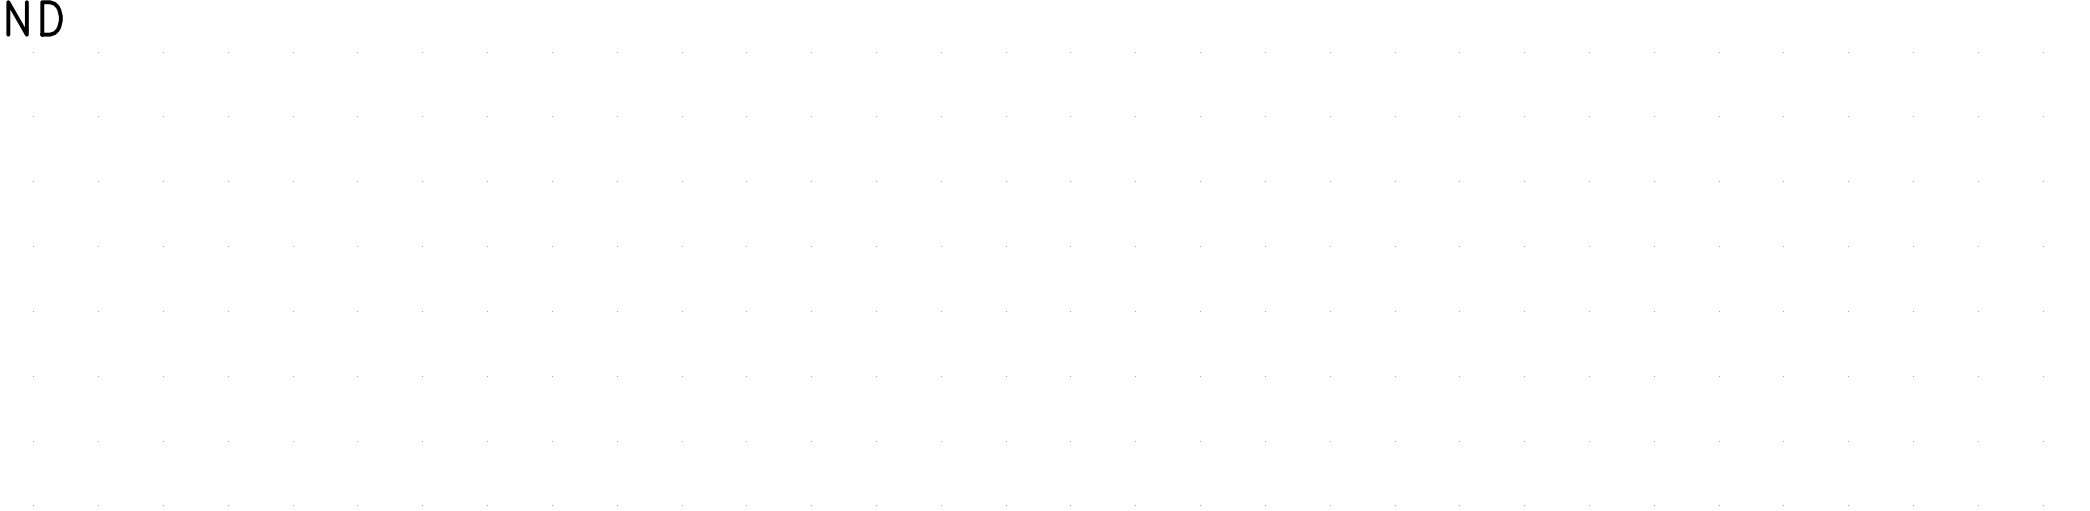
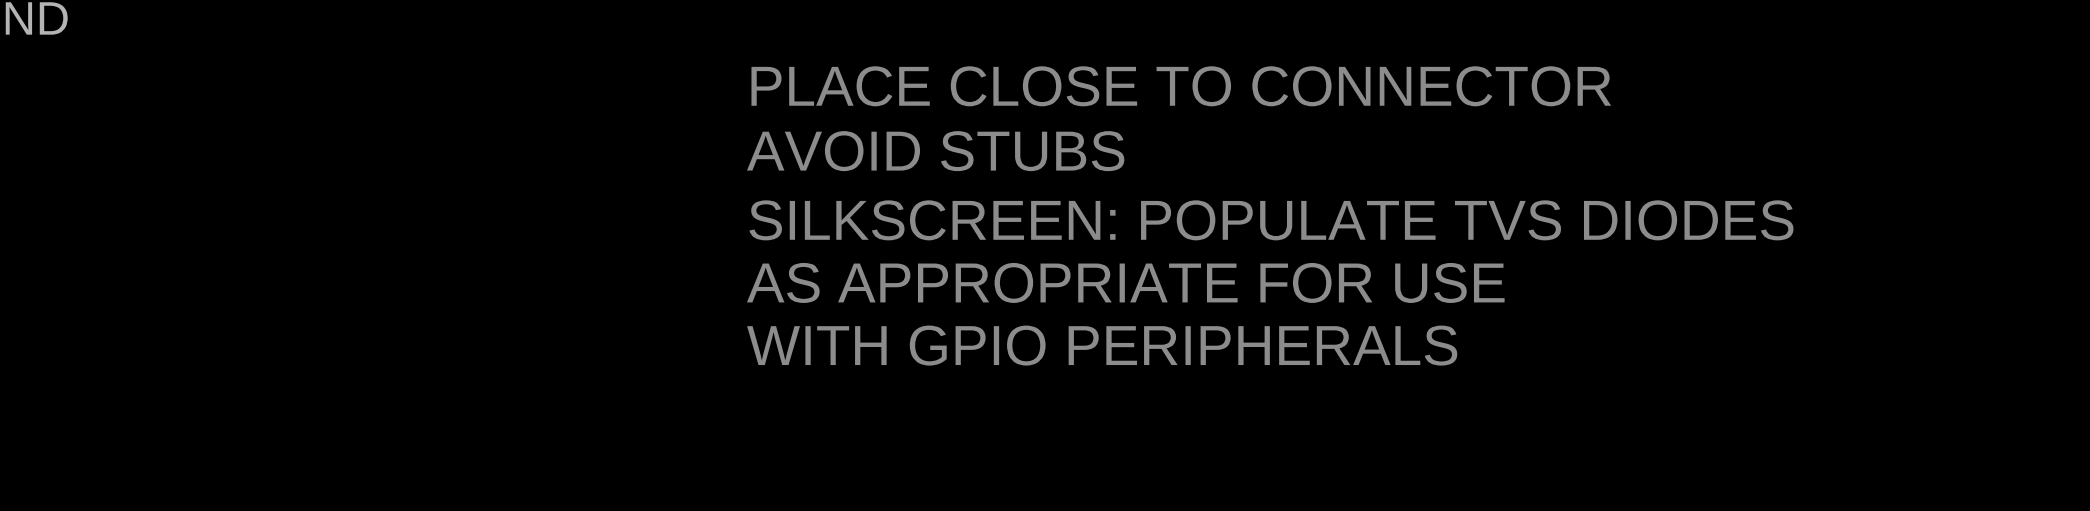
text: none -> PLACE CLOSE TO CONNECTOR (1181, 86)
text: none -> AVOID STUBS (935, 151)
text: none -> SILKSCREEN: POPULATE TVS DIODES (1271, 220)
text: none -> AS APPROPRIATE FOR USE (1125, 282)
text: none -> WITH GPIO PERIPHERALS (1102, 345)

